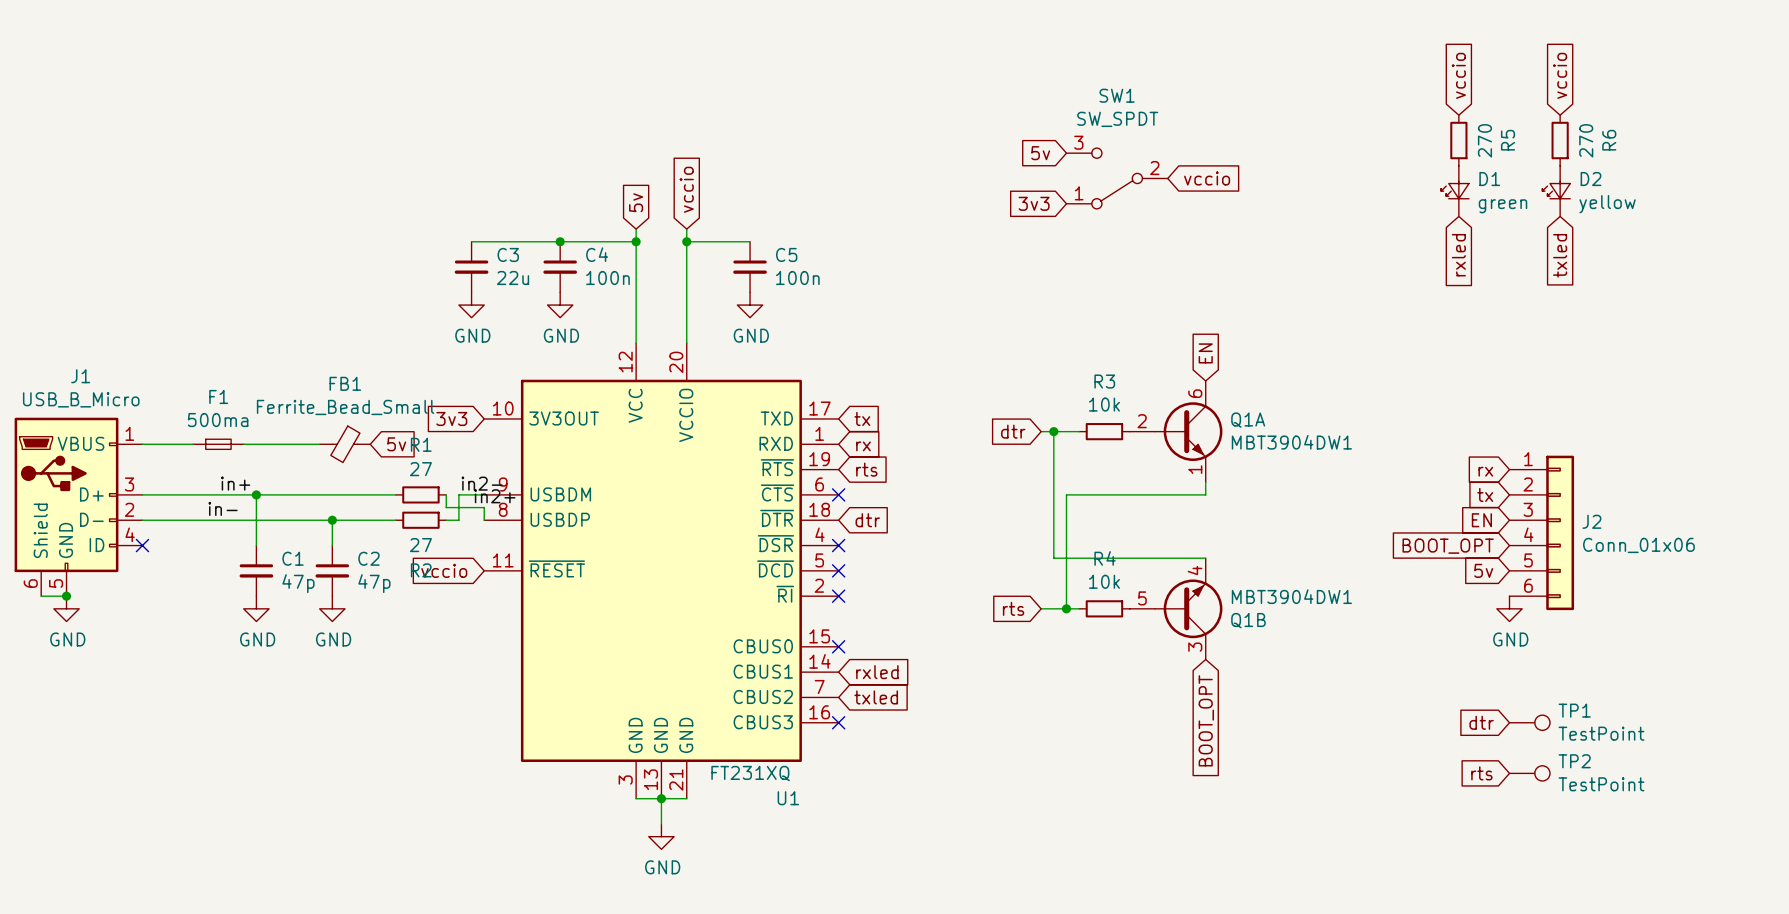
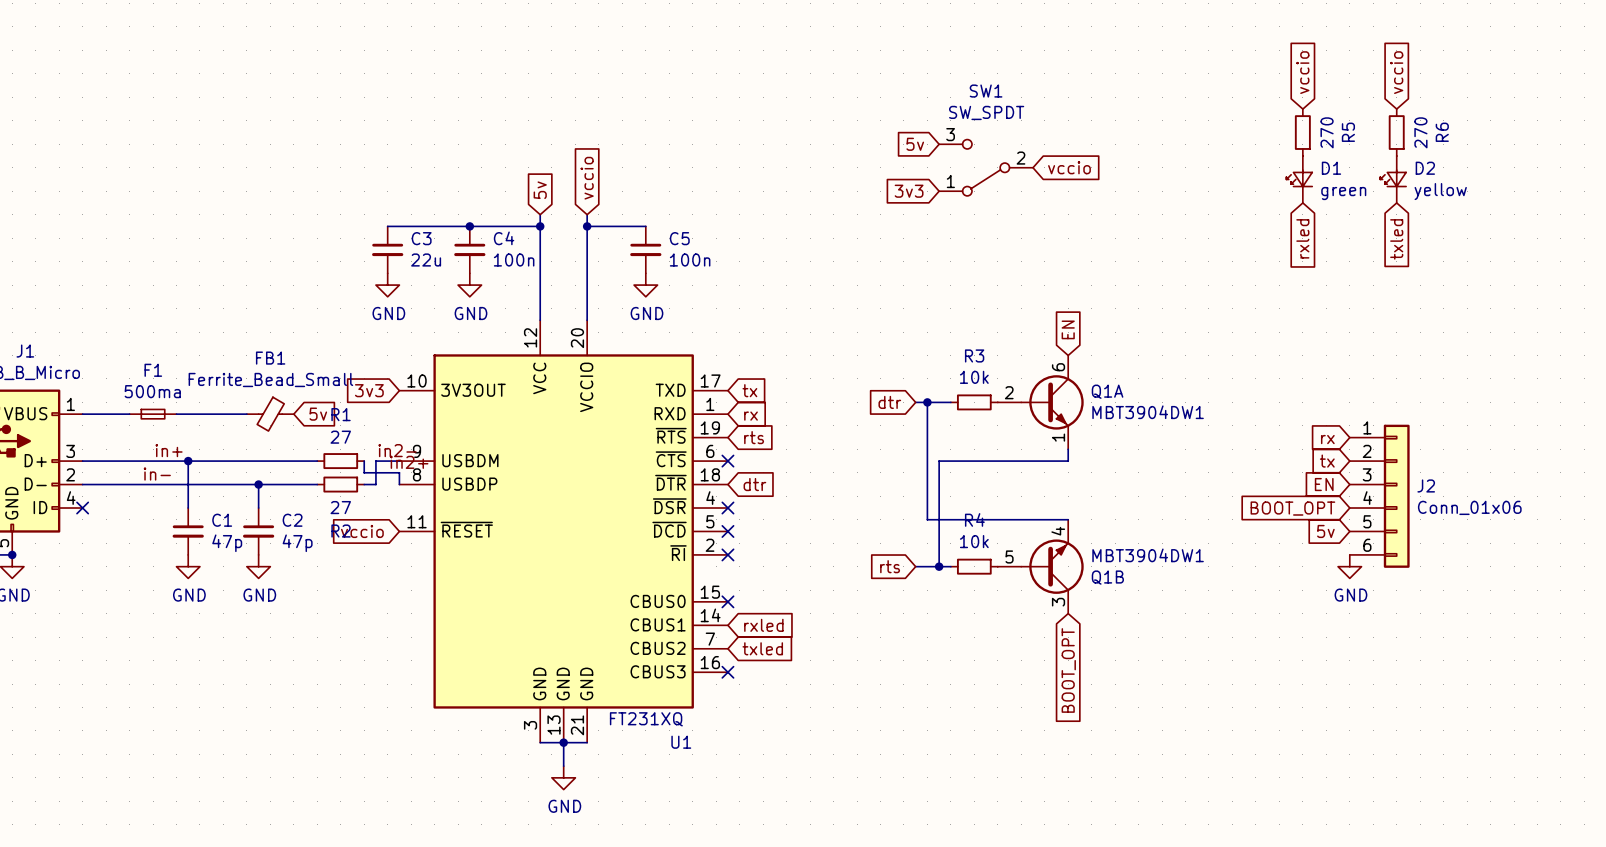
global label: dtr (1481, 722) -> none
TP1: TestPoint (1529, 722) -> none
global label: rts (1481, 773) -> none
TP2: TestPoint (1529, 773) -> none

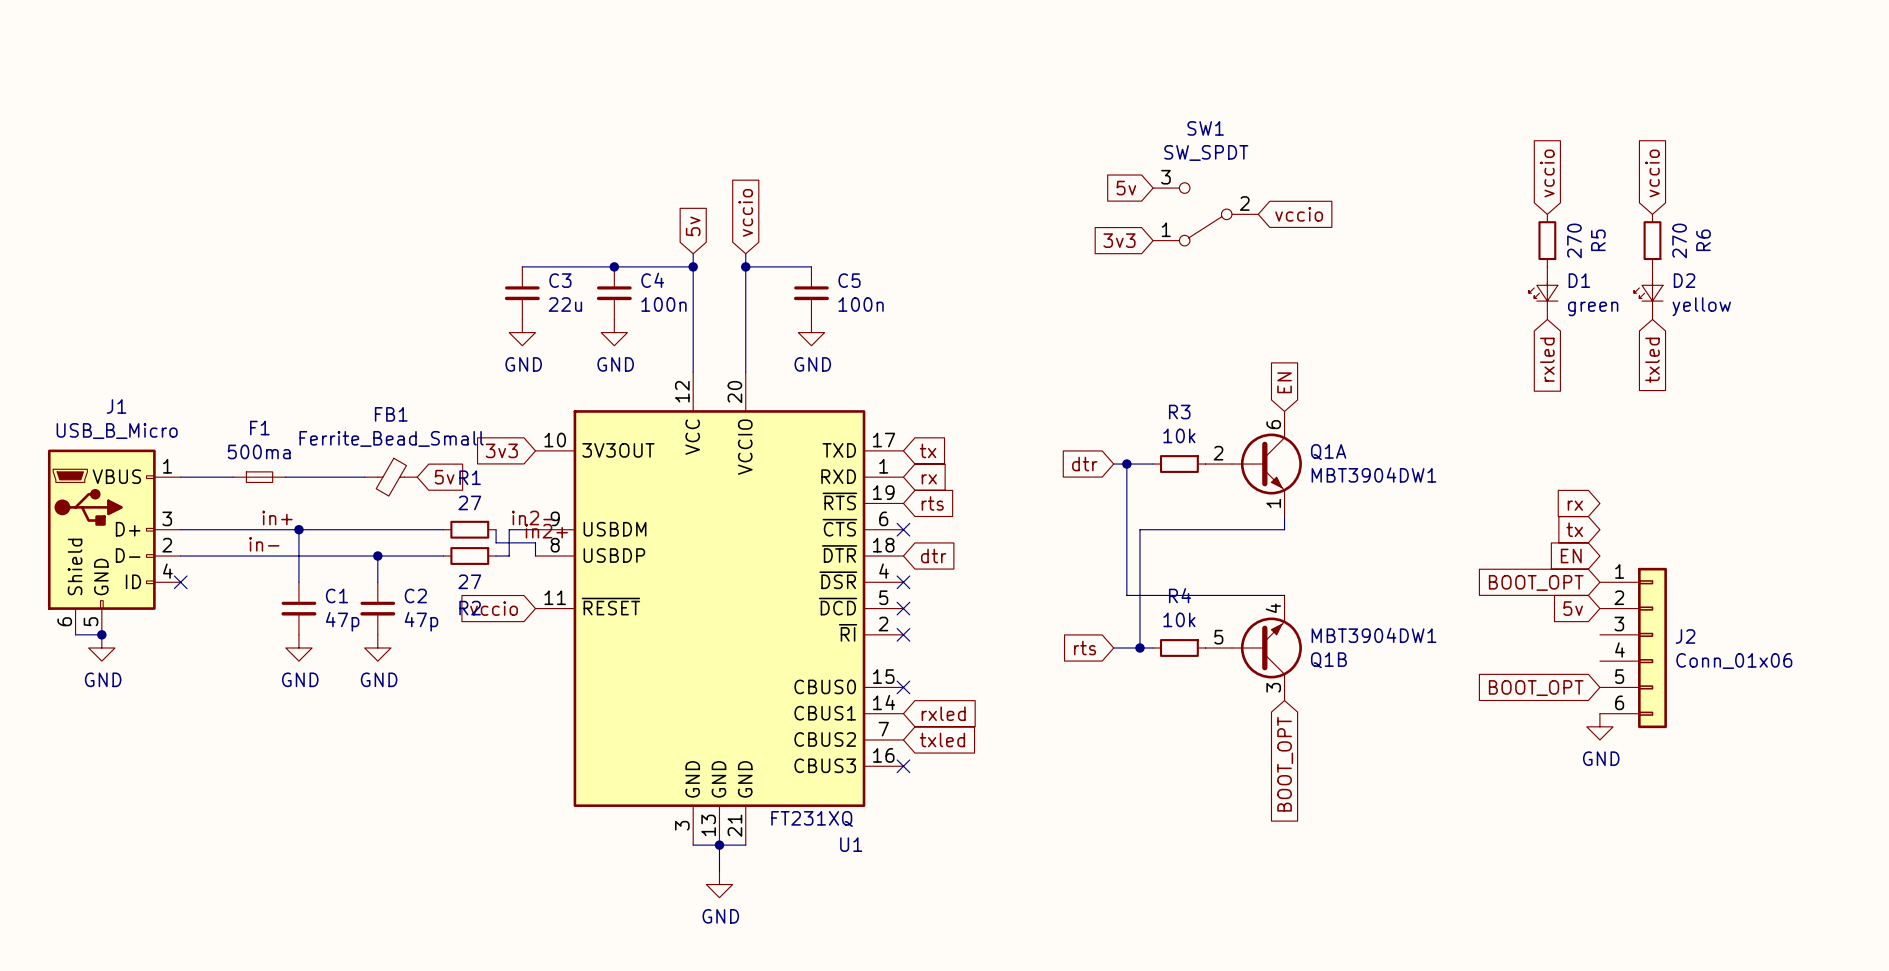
global label position: vccio (1302, 72) -> vccio (1547, 173)
global label position: vccio (1396, 72) -> vccio (1652, 173)
R5 position: (1302, 132) -> (1547, 240)
R6 position: (1396, 132) -> (1652, 240)
global label position: 5v (915, 144) -> 5v (1126, 188)
SW1 position: (986, 167) -> (1205, 214)
global label position: vccio (1069, 167) -> vccio (1299, 214)
D1 position: (1299, 179) -> (1543, 293)
D2 position: (1393, 179) -> (1648, 293)
global label position: 3v3 (909, 191) -> 3v3 (1119, 240)
global label position: rxled (1302, 238) -> rxled (1547, 359)
global label position: txled (1396, 239) -> txled (1652, 360)
J2 position: (1379, 496) -> (1633, 647)
power symbol position: GND (1349, 566) -> GND (1599, 726)
global label: none -> BOOT_OPT (1536, 688)

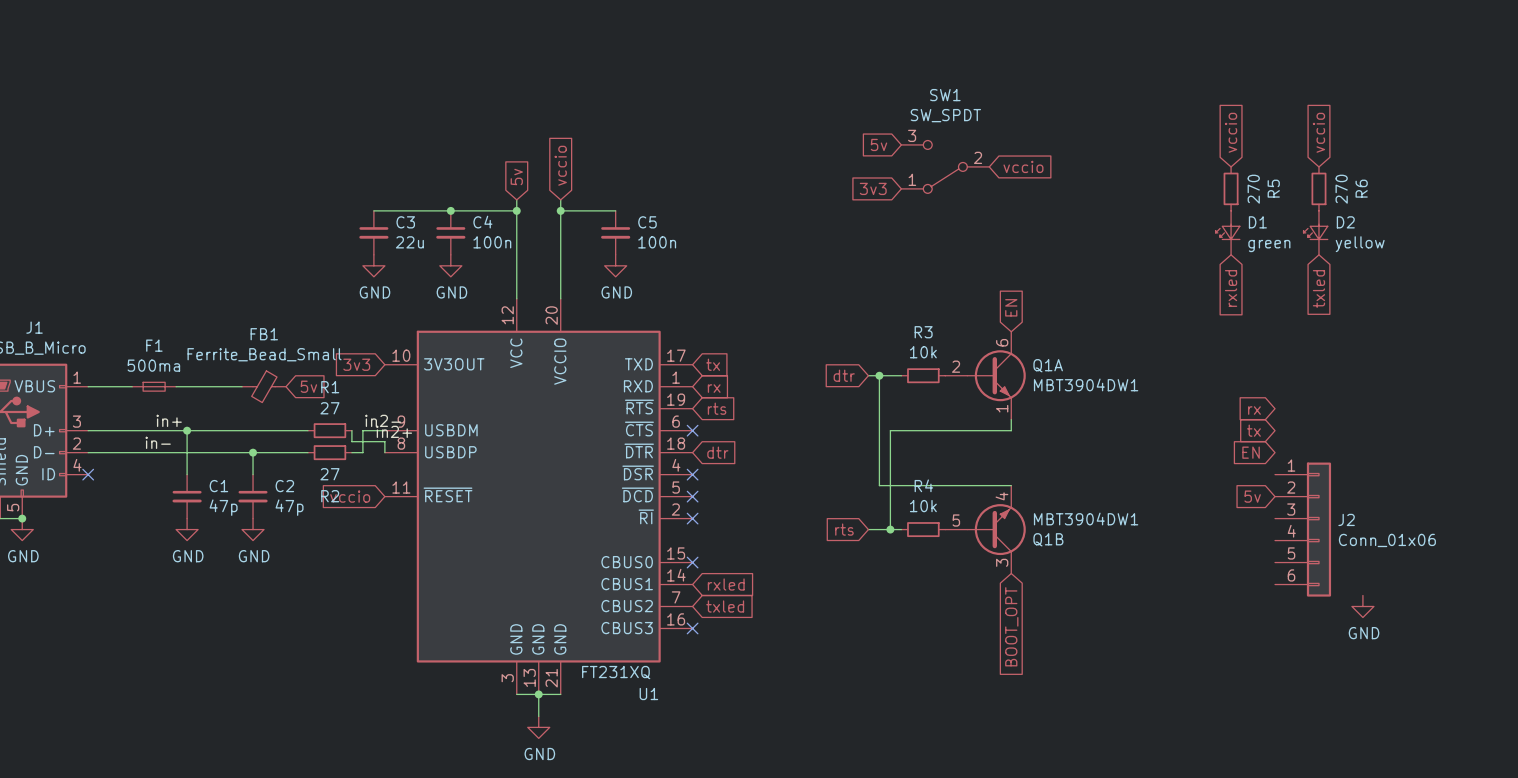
global label: BOOT_OPT (1536, 582) -> none
global label: BOOT_OPT (1536, 688) -> none
power symbol position: GND (1599, 726) -> GND (1362, 606)

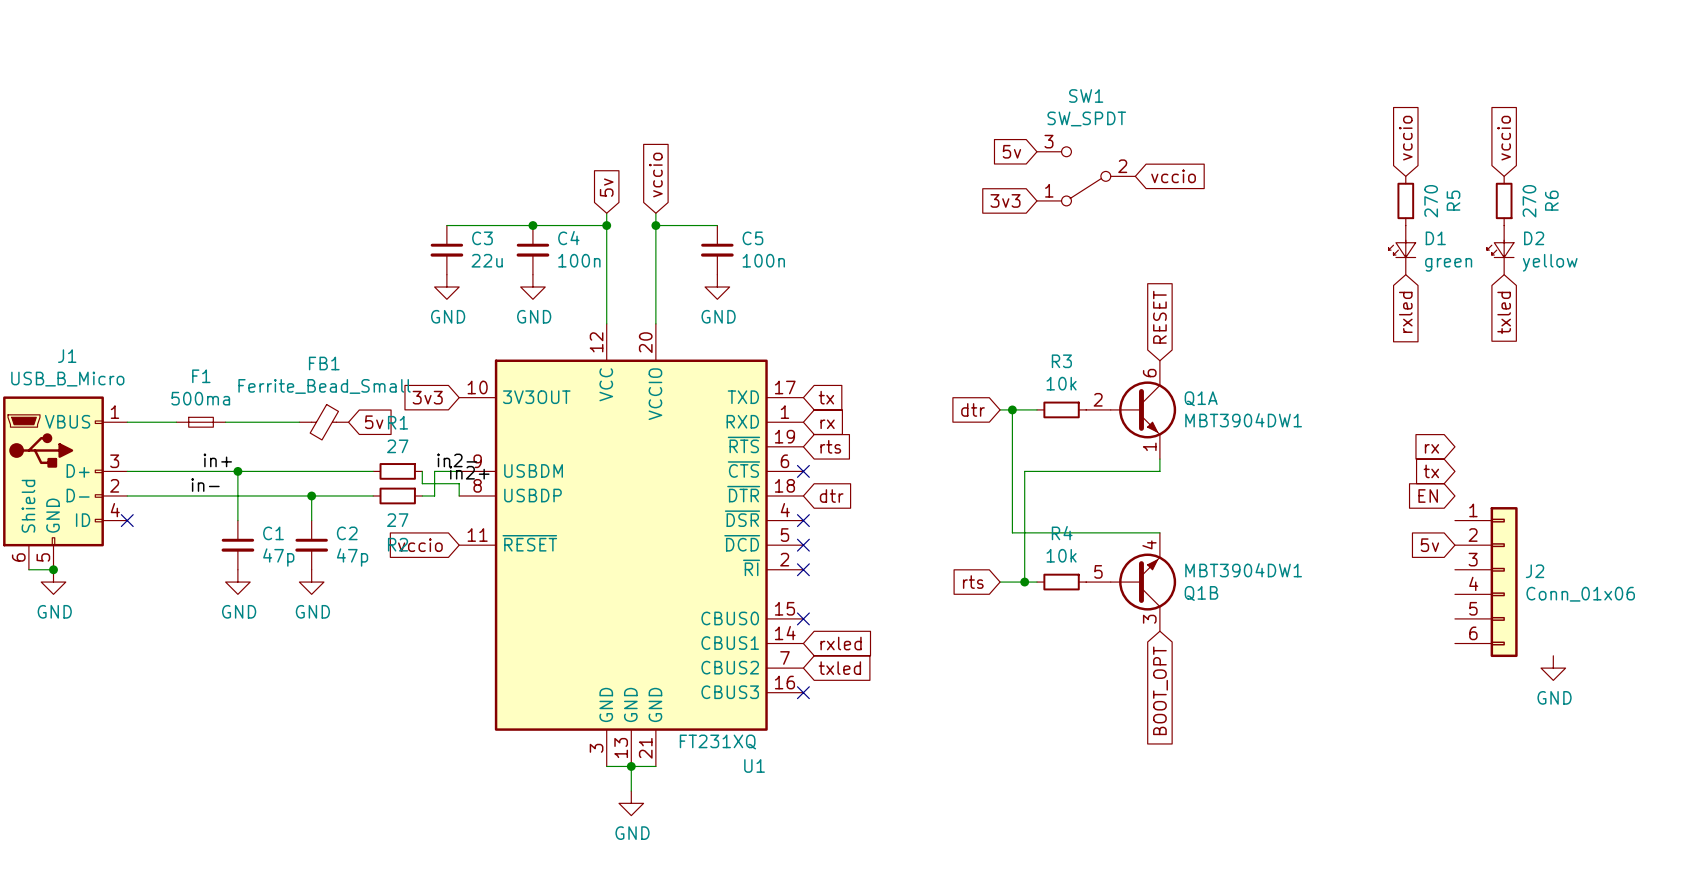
global label: EN (1011, 307) -> RESET (1159, 317)

